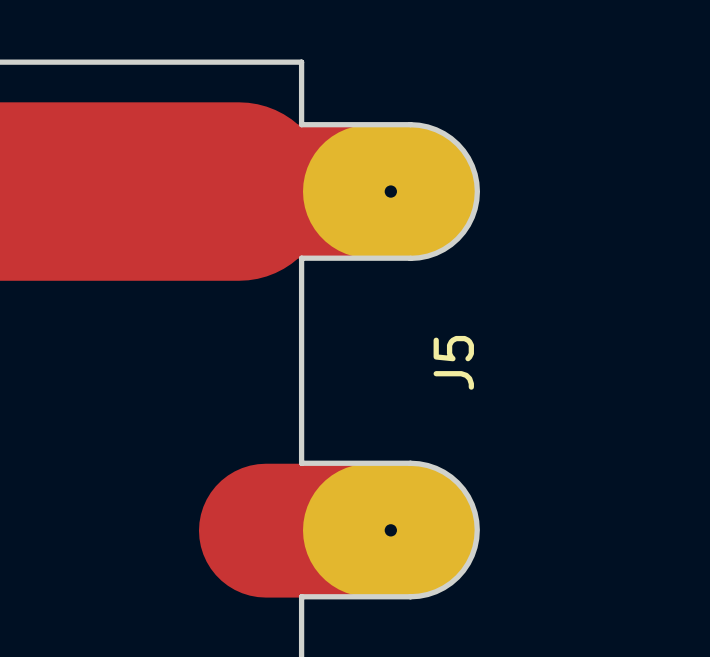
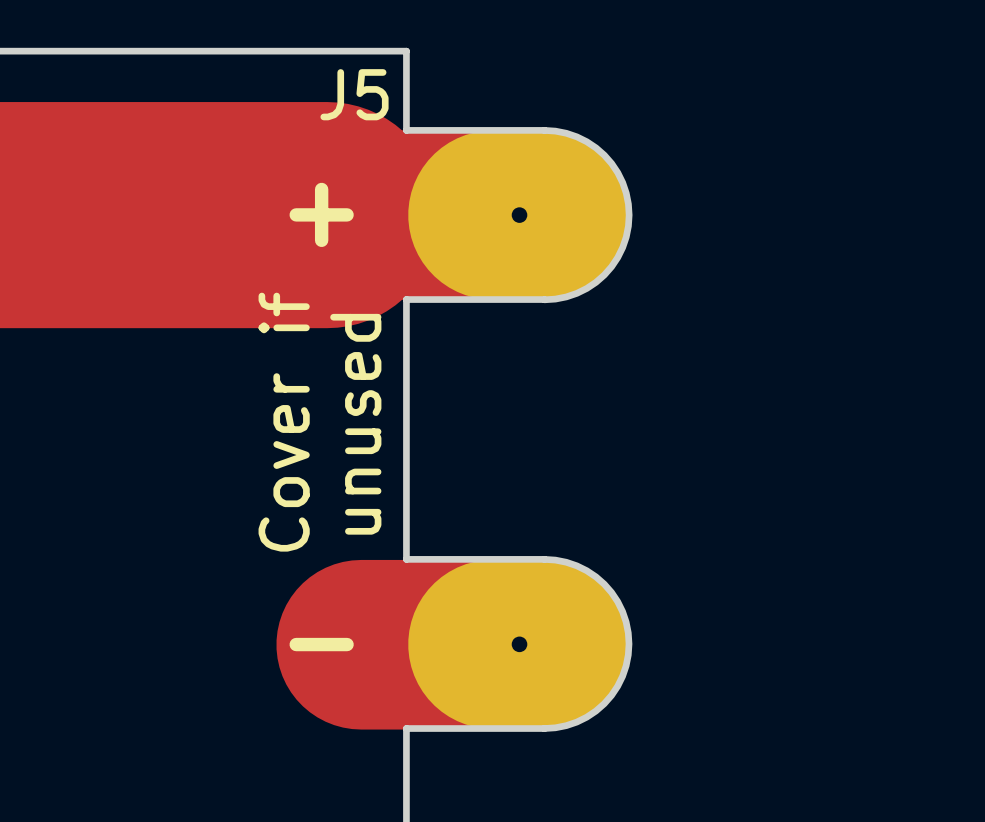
text: none -> + (321, 214)
text: none -> Cover if (284, 422)
text: none -> unused (355, 424)
J5 name rotation: 0° (453, 362) -> 90° clockwise (354, 94)
J5 name position: J5 (453, 362) -> J5 (354, 94)
text: none -> - (321, 644)

